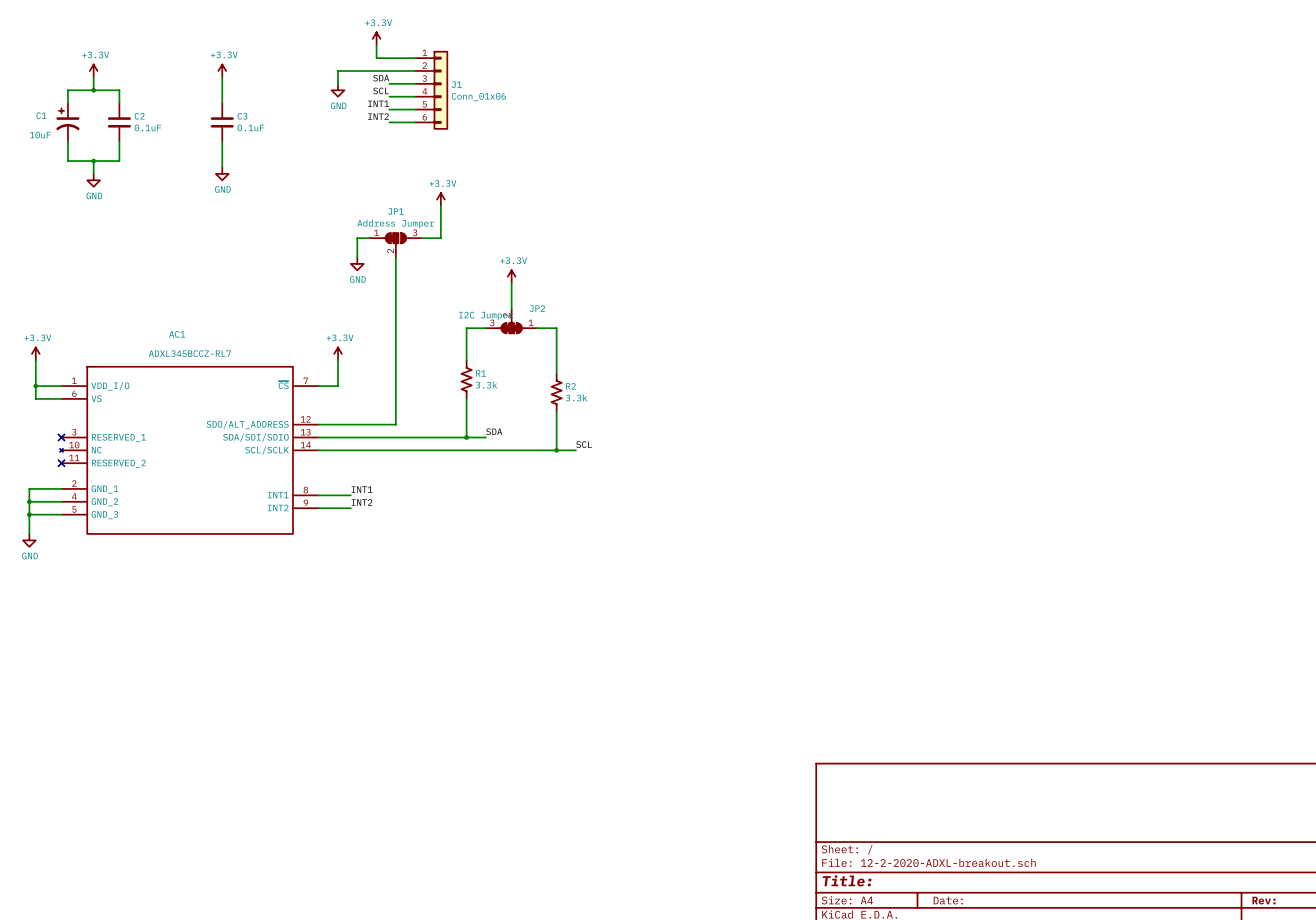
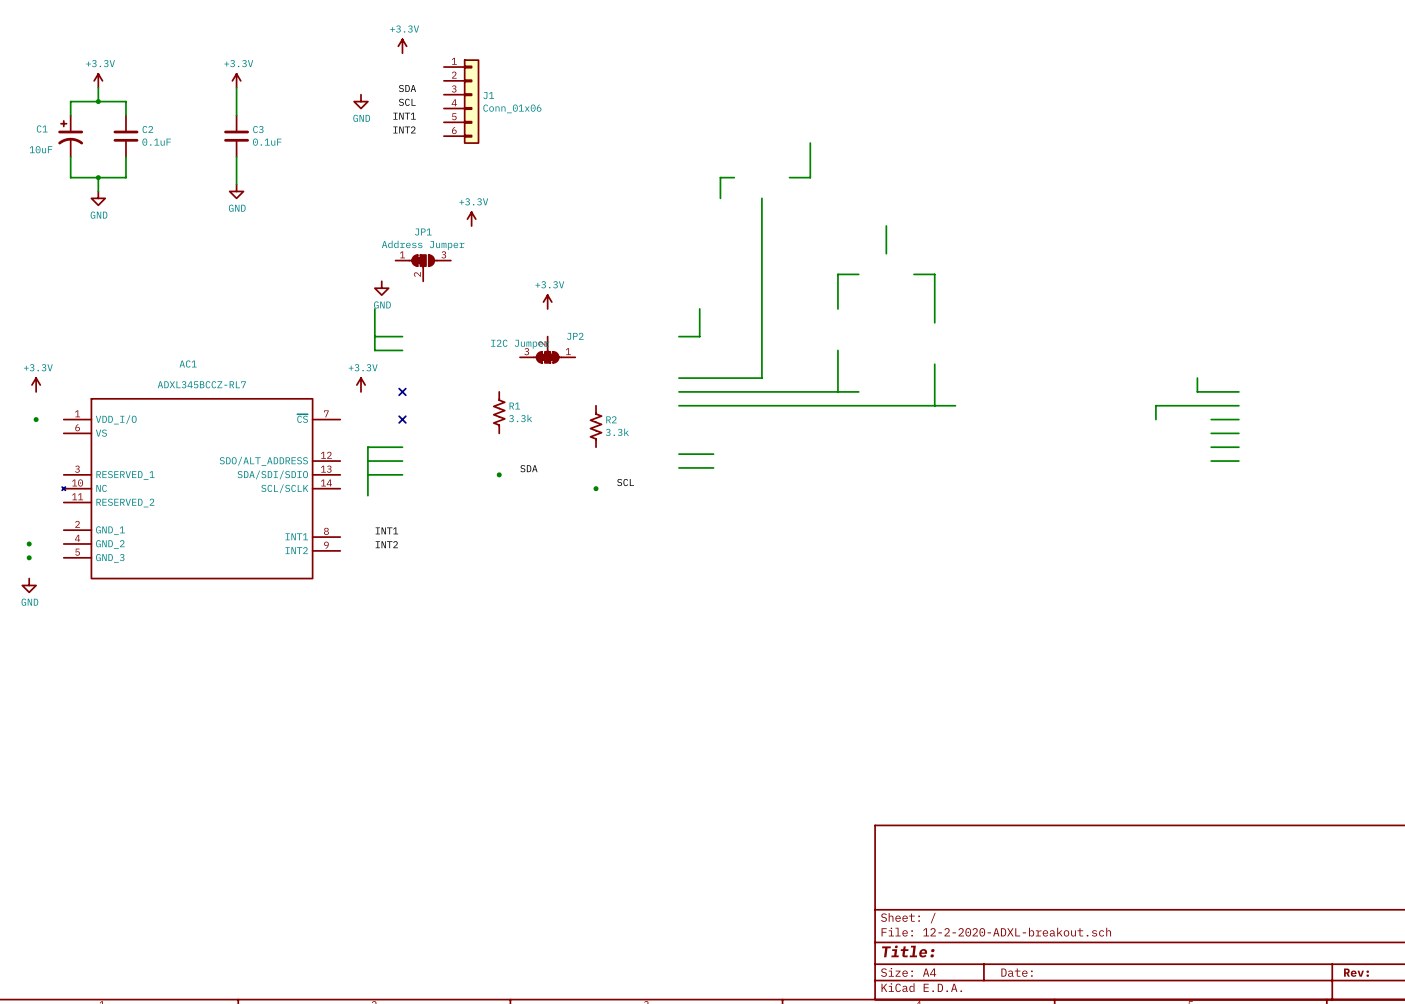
wire: (376, 45) (376, 58) (415, 58) -> none
wire: (415, 70) (338, 70) (338, 83) -> none
wire: (389, 83) (415, 83) -> none
wire: (389, 96) (415, 96) -> none
wire: (389, 109) (415, 109) -> none
wire: (389, 122) (415, 122) -> none
wire: none -> (810, 143) (810, 177) (789, 177)
wire: none -> (734, 177) (720, 177) (720, 198)
wire: none -> (761, 198) (761, 378) (678, 378)
wire: (440, 206) (440, 238) (421, 238) -> none
wire: none -> (886, 226) (886, 253)
wire: (370, 238) (357, 238) (357, 257) -> none
wire: none -> (858, 274) (837, 274) (837, 308)
wire: none -> (913, 274) (934, 274) (934, 322)
wire: (395, 257) (395, 424) (376, 424) -> none
wire: none -> (374, 308) (374, 350) (402, 350)
wire: (511, 283) (511, 308) -> none
wire: none -> (699, 308) (699, 336) (678, 336)
wire: none -> (837, 350) (837, 391)
wire: (485, 328) (466, 328) (466, 360) -> none
wire: (537, 328) (556, 328) (556, 373) -> none
wire: none -> (934, 364) (934, 405)
wire: none -> (1197, 378) (1197, 391) (1238, 391)
wire: (35, 360) (35, 398) (61, 398) -> none
wire: (338, 360) (338, 386) (318, 386) -> none
no-connect mark: none -> (402, 391)
wire: none -> (678, 391) (858, 391)
wire: none -> (678, 405) (955, 405)
wire: none -> (1238, 405) (1155, 405) (1155, 419)
wire: (35, 386) (61, 386) -> none
no-connect mark: none -> (402, 419)
wire: none -> (1211, 419) (1238, 419)
wire: (466, 398) (466, 437) -> none
wire: none -> (1211, 433) (1238, 433)
wire: none -> (402, 447) (367, 447) (367, 495)
wire: (556, 411) (556, 450) -> none
wire: none -> (1211, 447) (1238, 447)
wire: none -> (678, 454) (713, 454)
wire: (318, 424) (344, 424) -> (374, 336) (402, 336)
wire: none -> (1211, 461) (1238, 461)
wire: none -> (678, 467) (713, 467)
no-connect mark: (61, 437) -> none
wire: (318, 437) (344, 437) -> none
wire: (376, 437) (485, 437) -> none
wire: (318, 450) (575, 450) -> none
no-connect mark: (61, 463) -> none
wire: (61, 488) (29, 488) (29, 533) -> none
wire: (318, 495) (350, 495) -> none
wire: (29, 501) (61, 501) -> none
wire: (318, 508) (350, 508) -> none
wire: (29, 514) (61, 514) -> none

